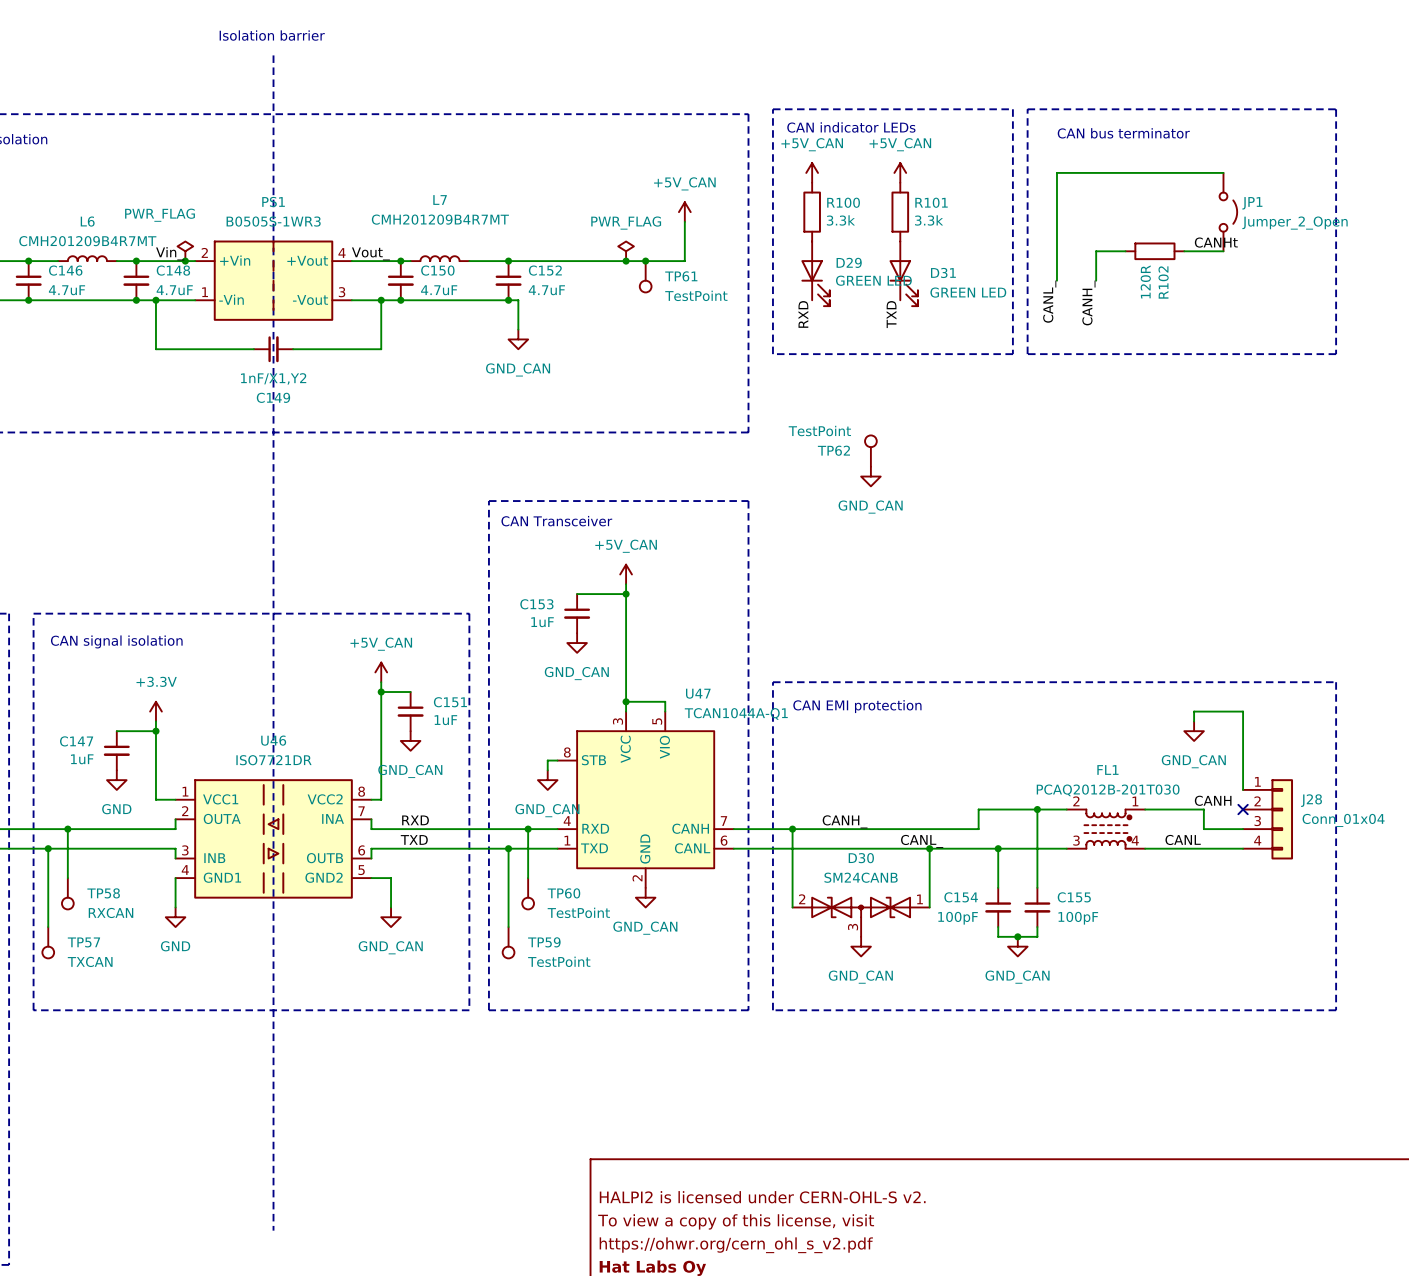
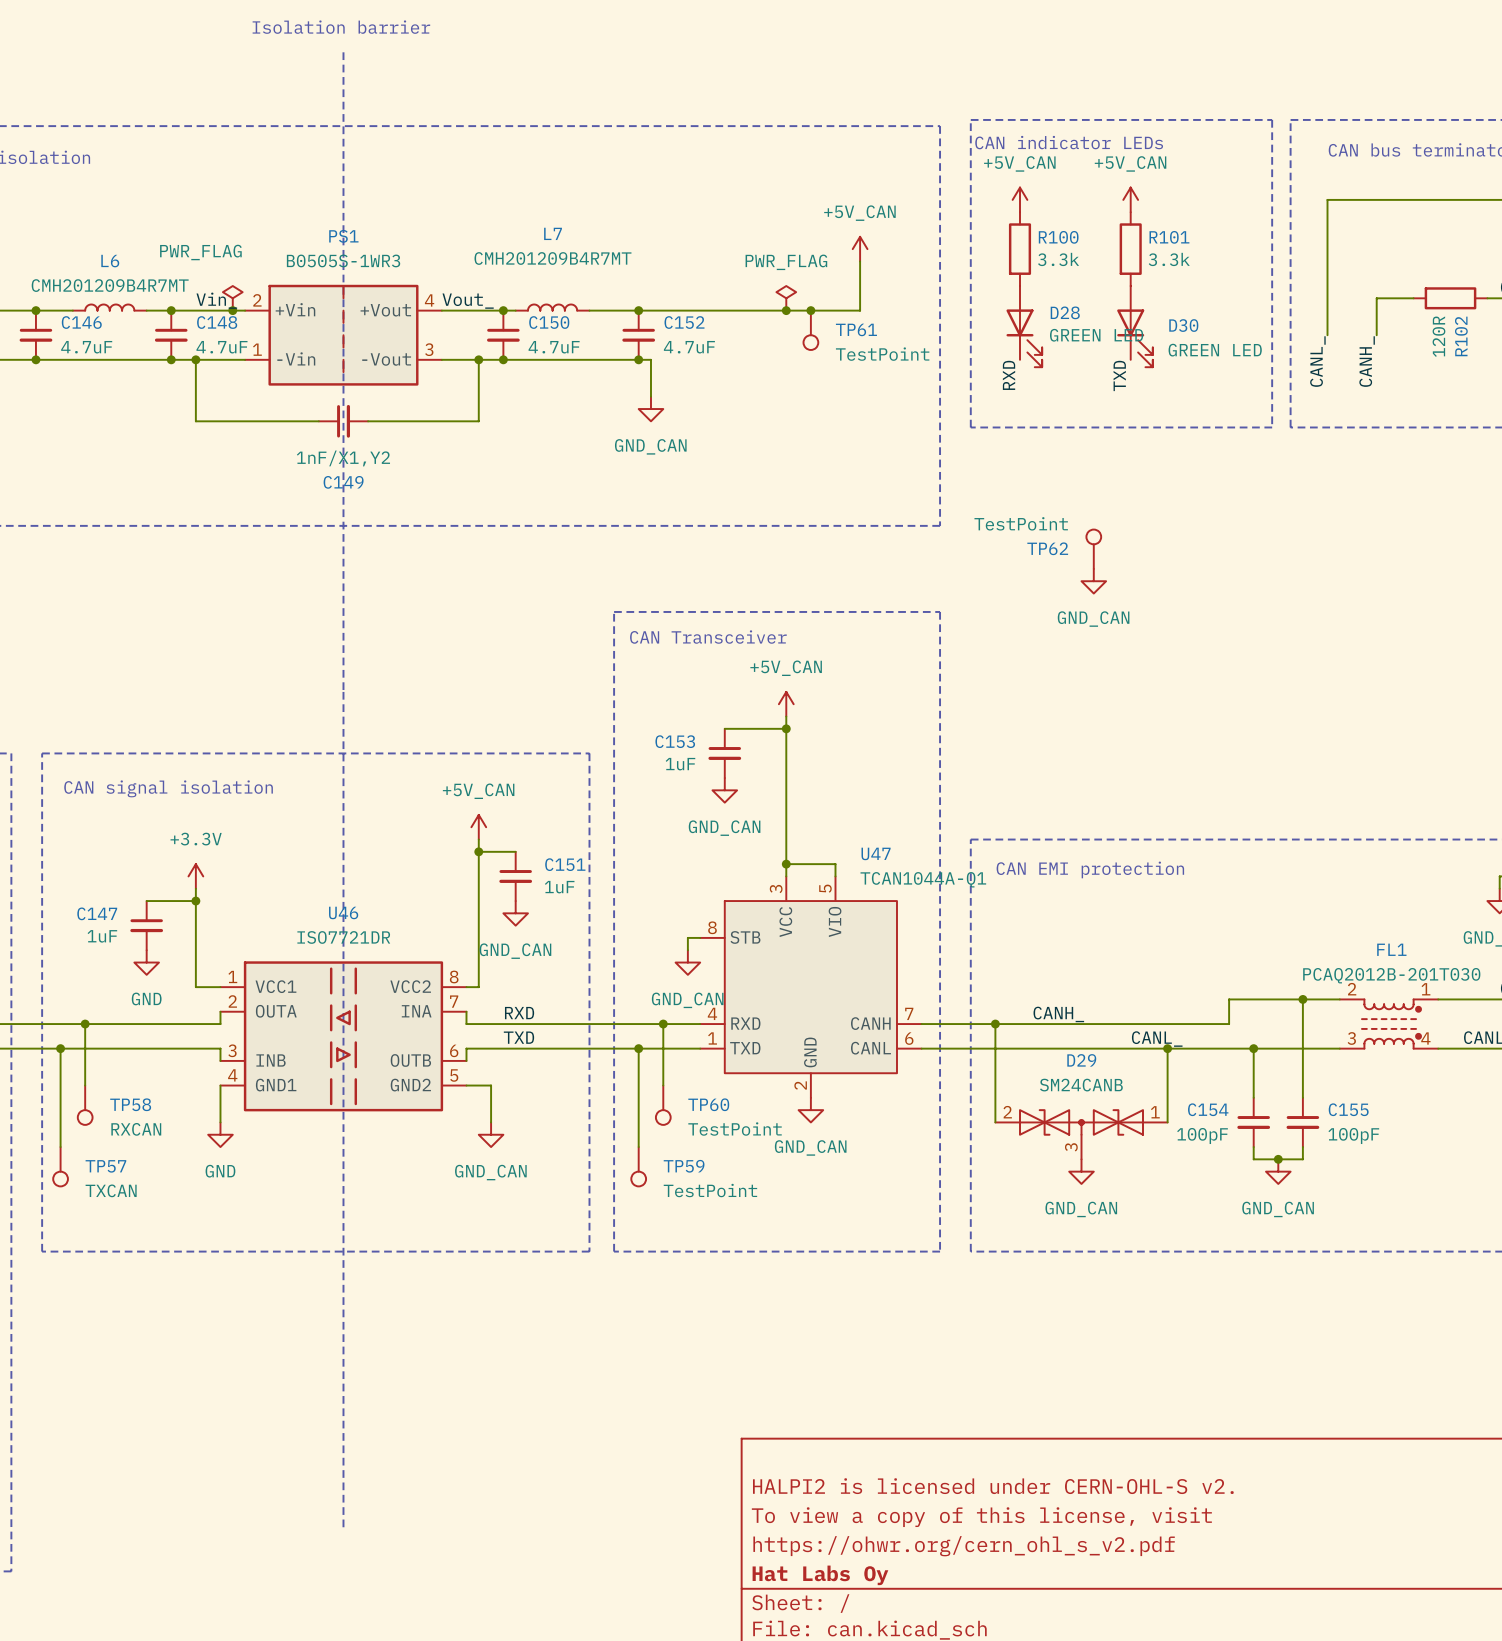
D29 name: D29 (849, 262) -> D28 (1065, 312)
D31 name: D31 (943, 272) -> D30 (1183, 325)
D30 name: D30 (861, 858) -> D29 (1081, 1060)

